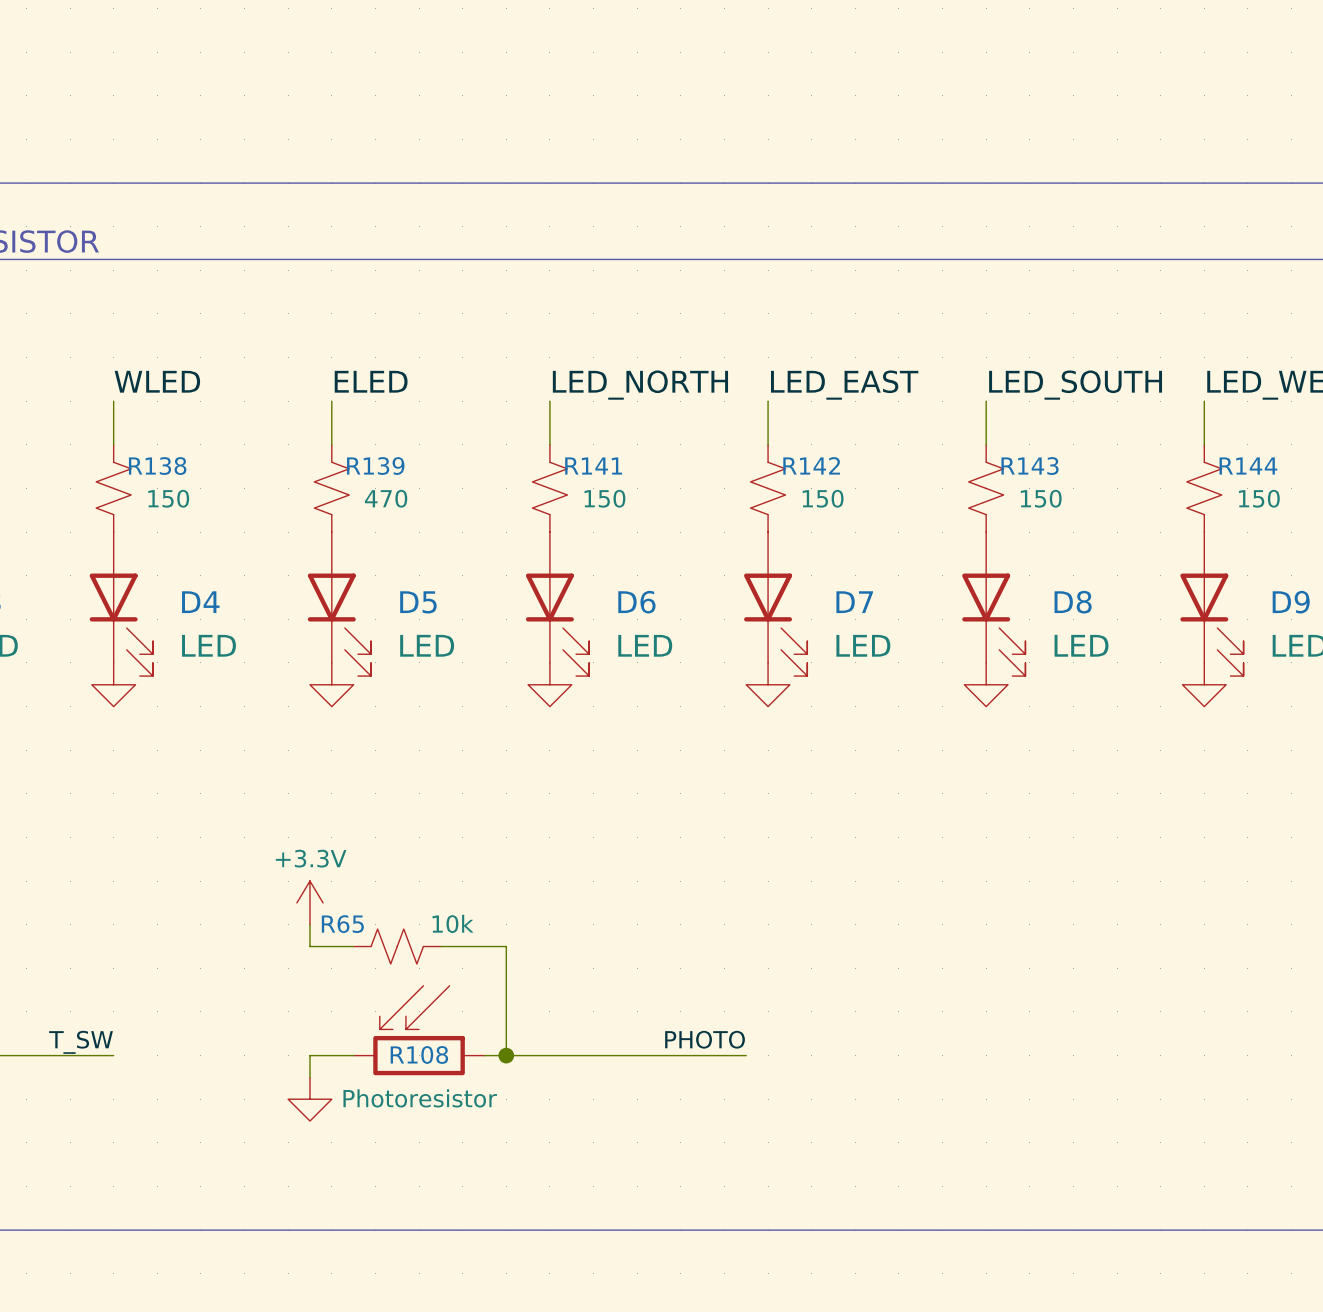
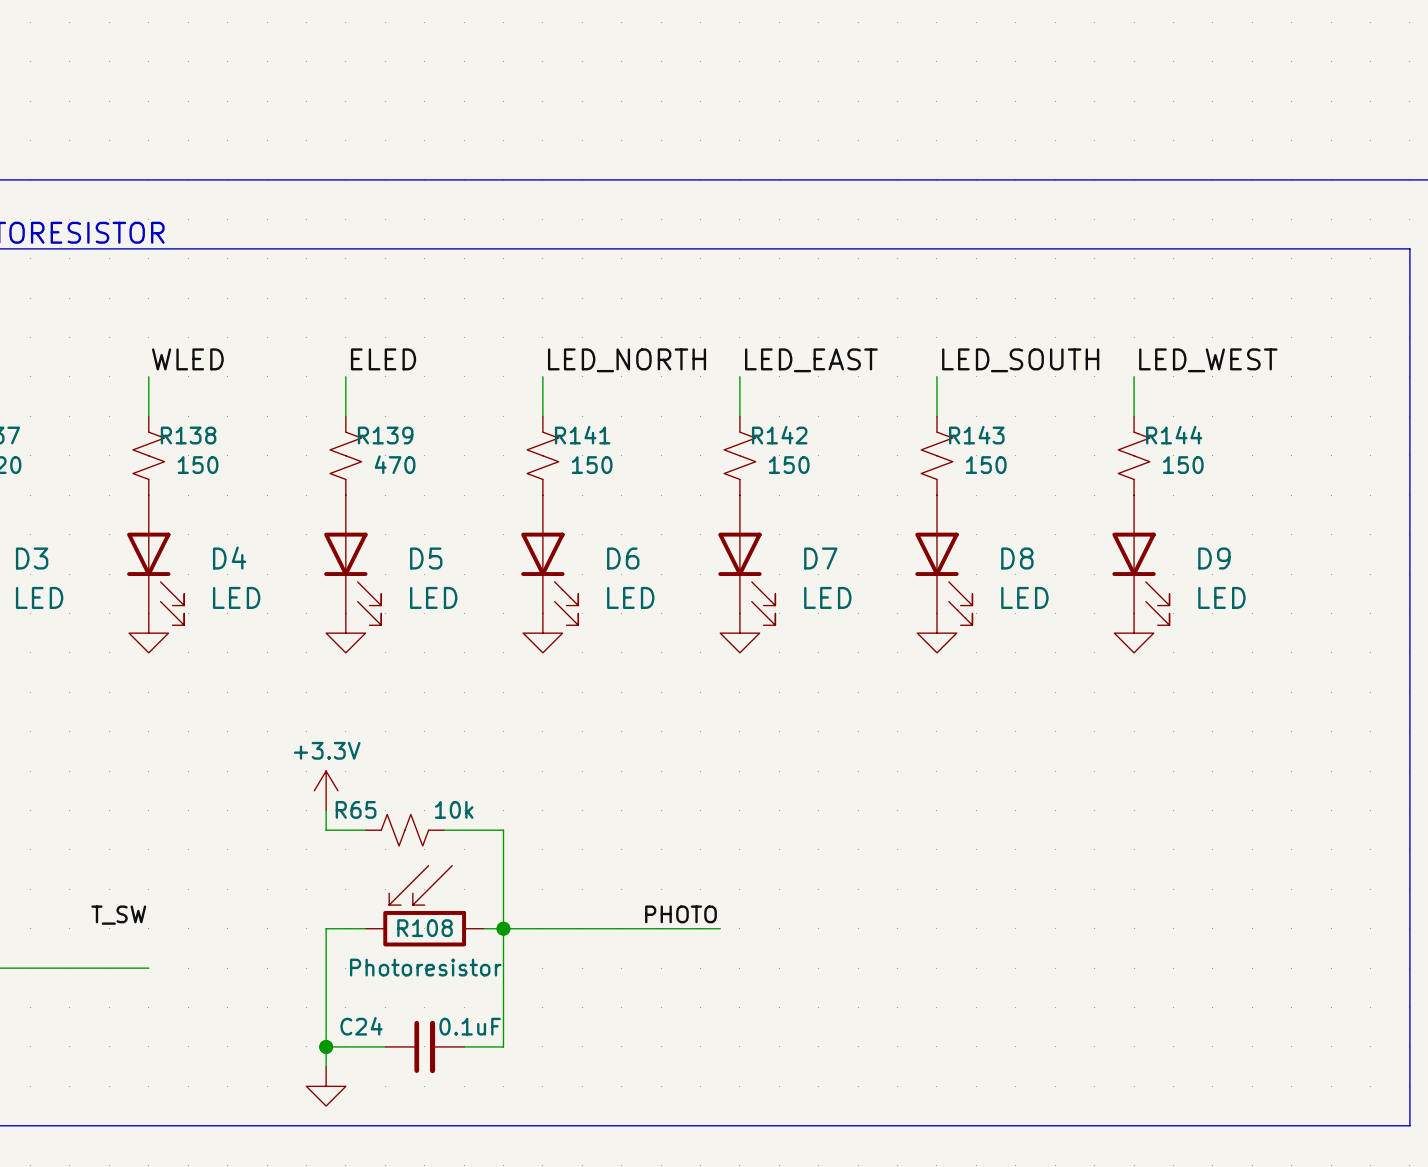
power symbol position: +3.3V (309, 902) -> +3.3V (326, 790)
wire: (309, 924) (309, 946) (353, 946) -> (326, 810) (326, 830) (365, 830)
R65 position: (397, 946) -> (404, 830)
wire: (440, 946) (506, 946) -> (444, 830) (503, 830) (503, 869)
R108 position: (419, 1030) -> (424, 906)
label position: PHOTO (705, 1039) -> PHOTO (681, 914)
label position: T_SW (81, 1042) -> T_SW (118, 915)
wire: (309, 1055) (353, 1055) -> (326, 968) (326, 928) (365, 928)
wire: (484, 1055) (746, 1055) -> (483, 928) (720, 928)
wire: none -> (503, 968) (503, 1046) (464, 1046)
junction position: (506, 1055) -> (503, 928)
wire: none -> (326, 987) (326, 1066)
power symbol position: (309, 1099) -> (326, 1086)
wire: none -> (326, 1046) (385, 1046)
junction: none -> (326, 1046)
C24: none -> 0.1uF (424, 1046)

